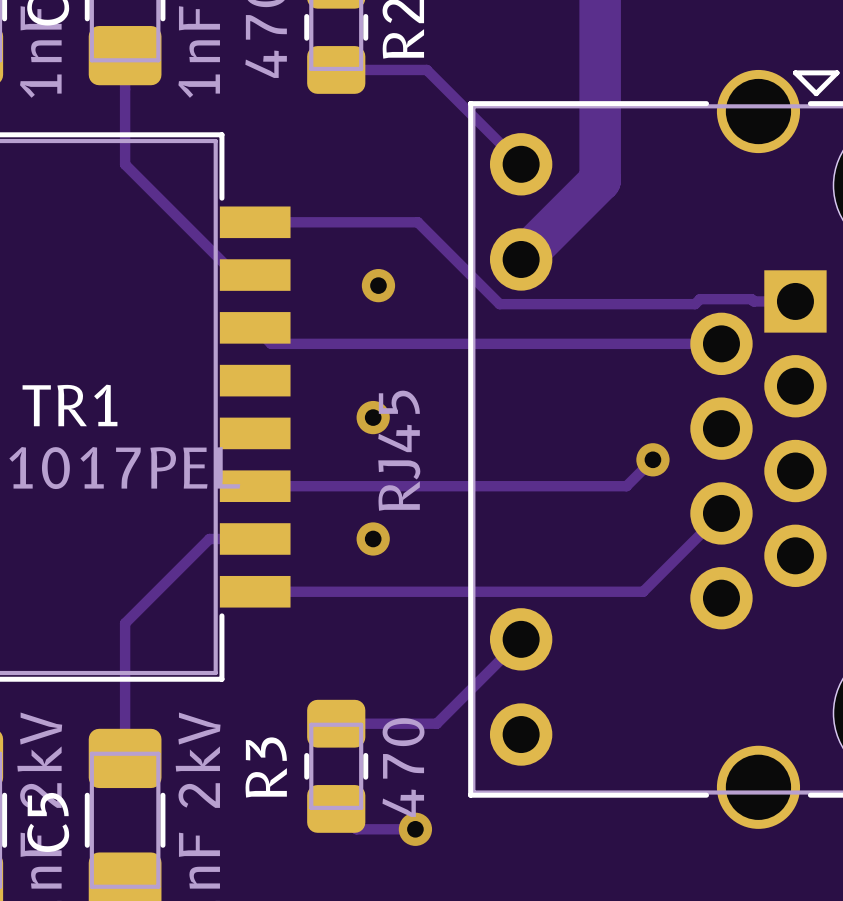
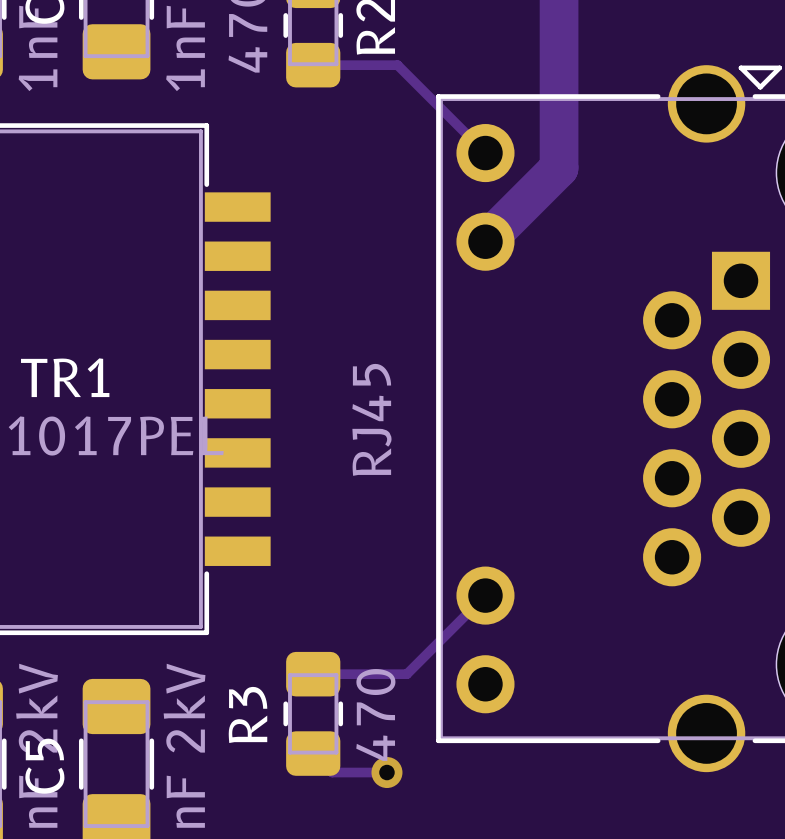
track: (125, 55) (125, 164) (235, 275) (255, 275) -> none
track: (255, 222) (417, 222) (499, 304) (695, 304) (700, 299) (795, 301) -> none
via: (378, 285) -> none
track: (255, 327) (271, 343) (721, 343) -> none
via: (373, 417) -> none
track: (652, 459) (626, 486) (255, 486) -> none
via: (652, 459) -> none
track: (721, 513) (643, 591) (255, 591) -> none
track: (255, 538) (209, 538) (125, 623) (125, 758) -> none
via: (373, 538) -> none

